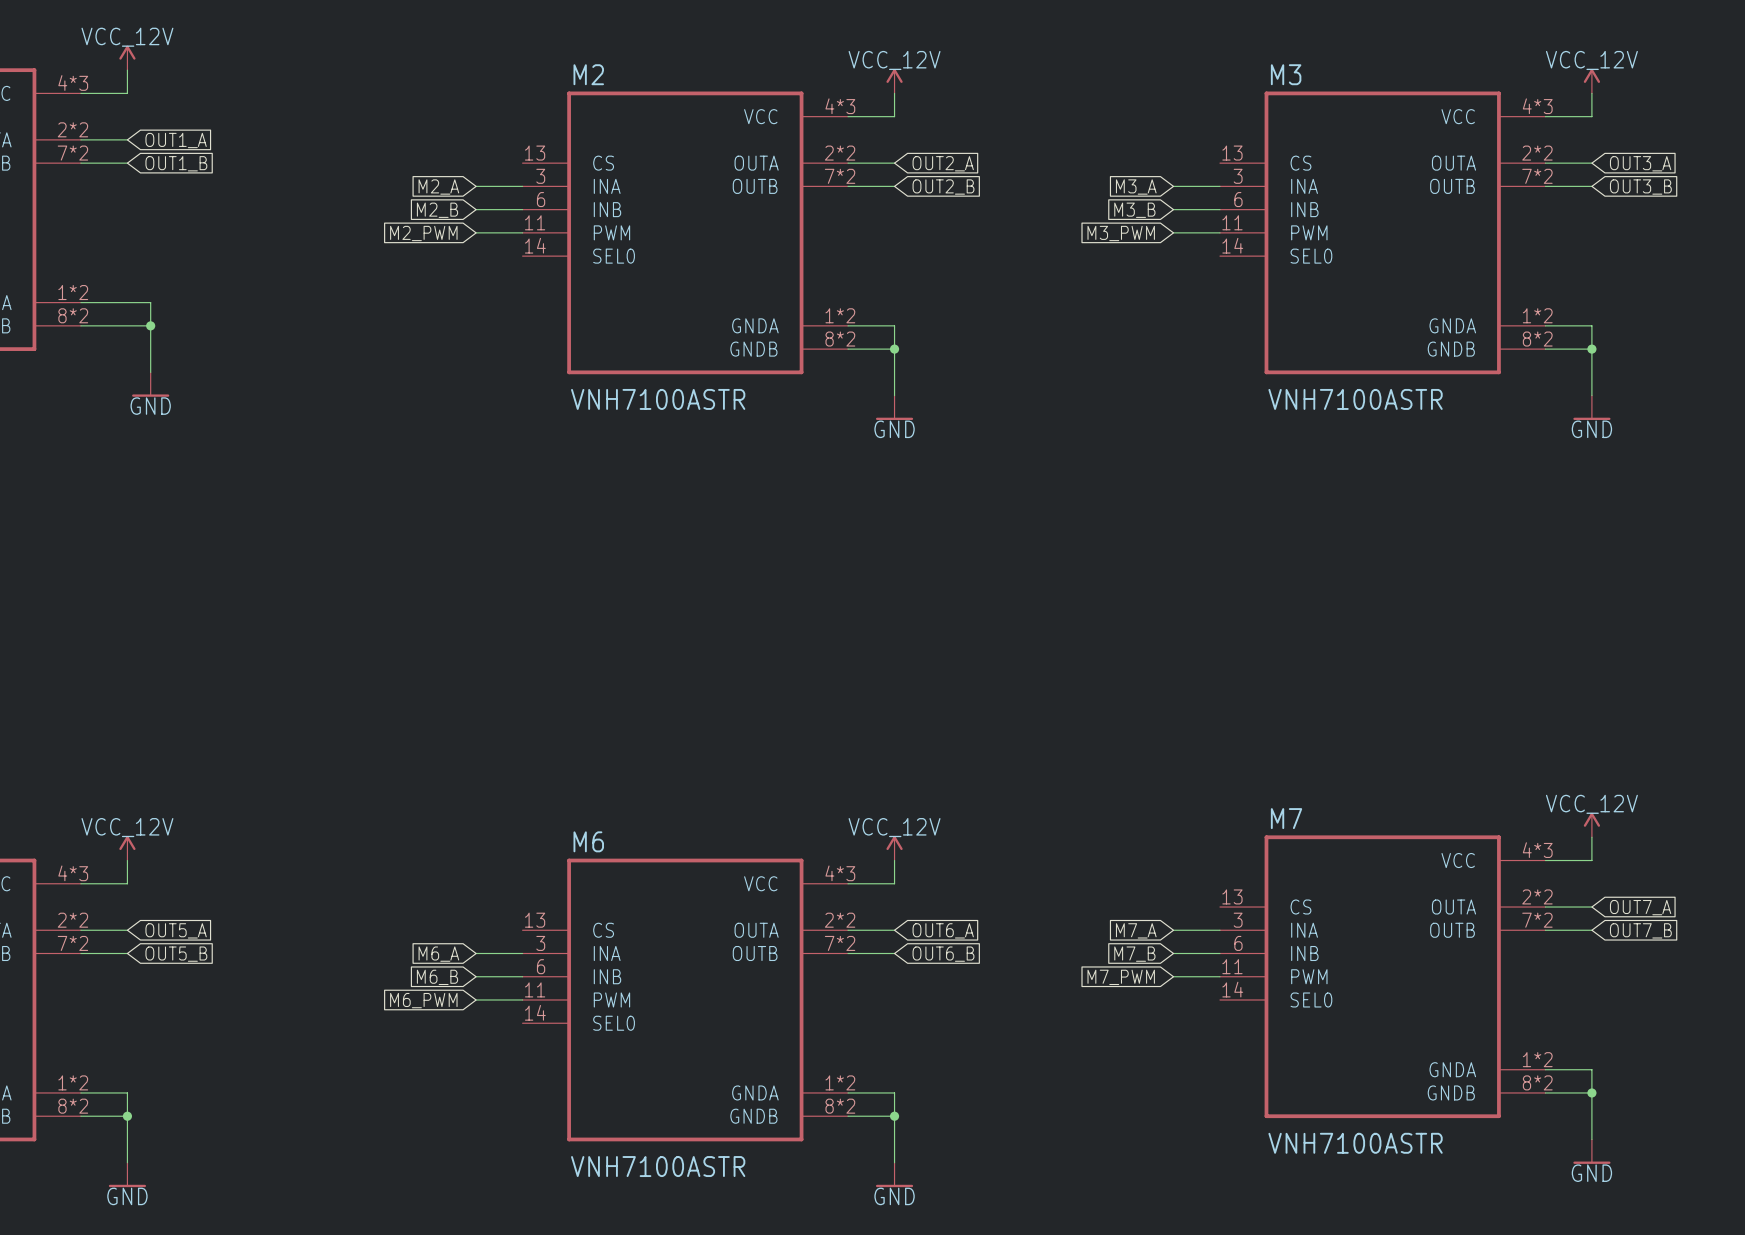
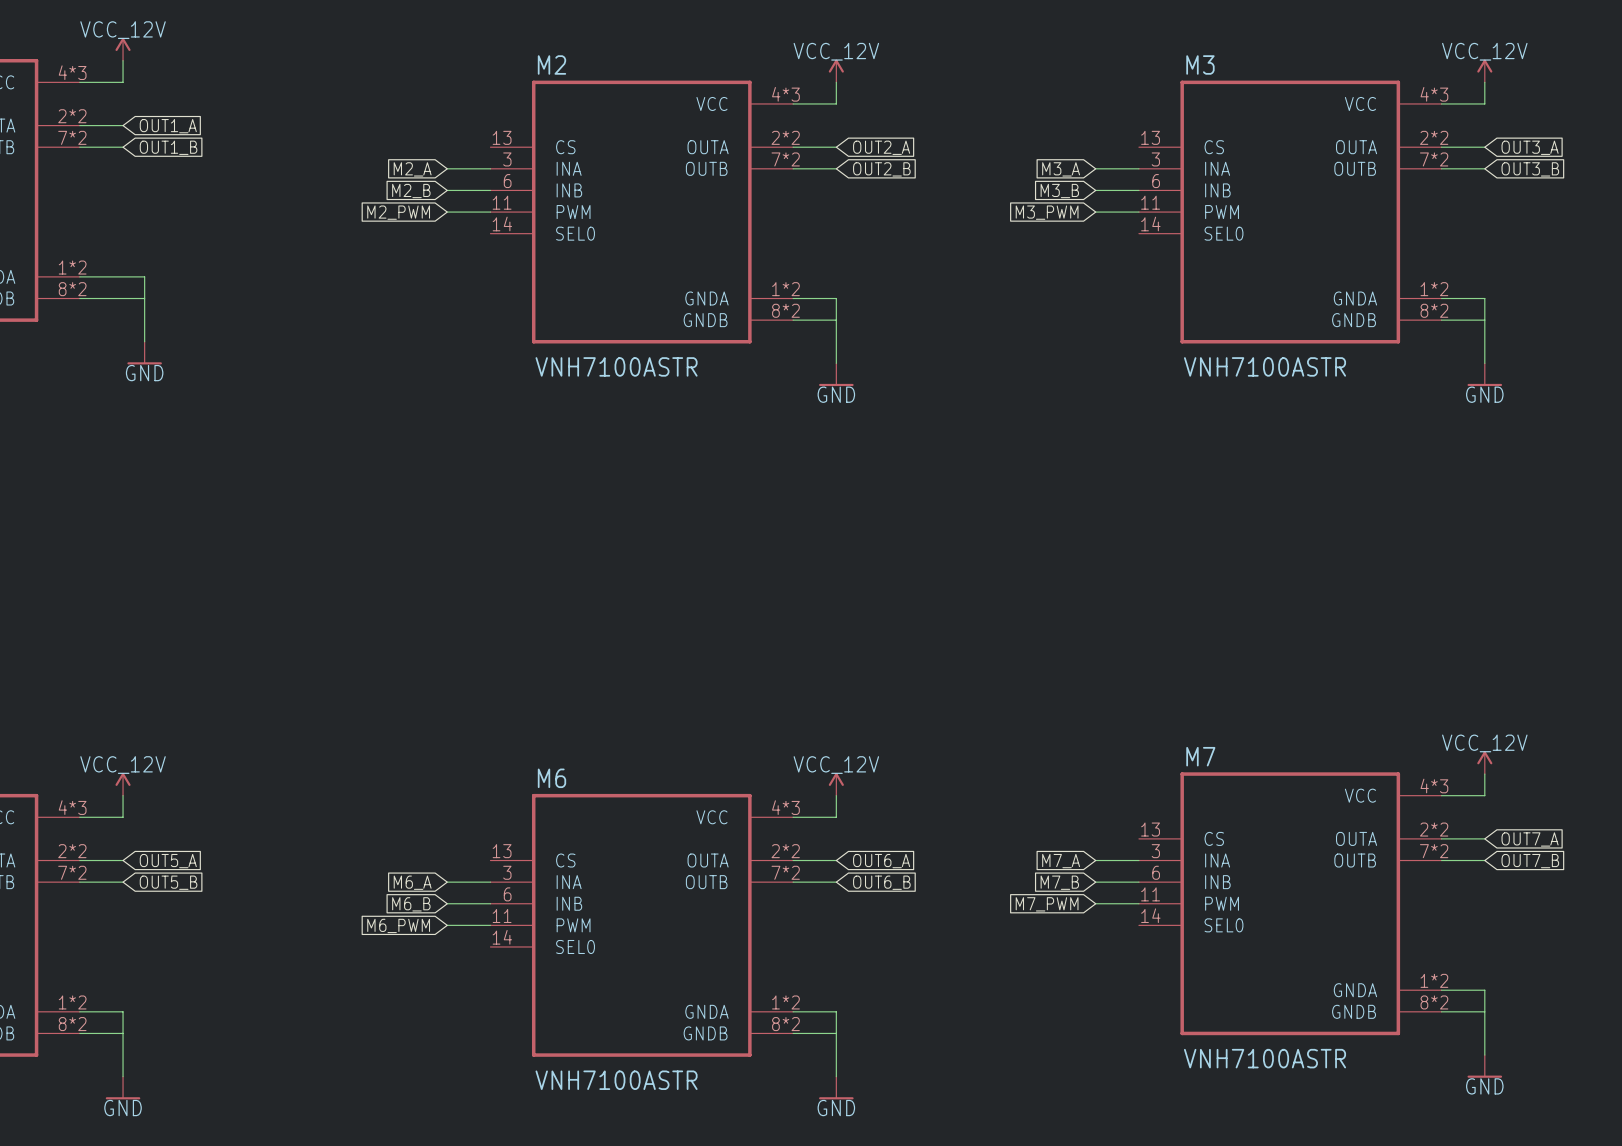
junction: (150, 325) -> none
junction: (894, 349) -> none
junction: (1591, 349) -> none
junction: (1591, 1092) -> none
junction: (127, 1116) -> none
junction: (894, 1116) -> none

